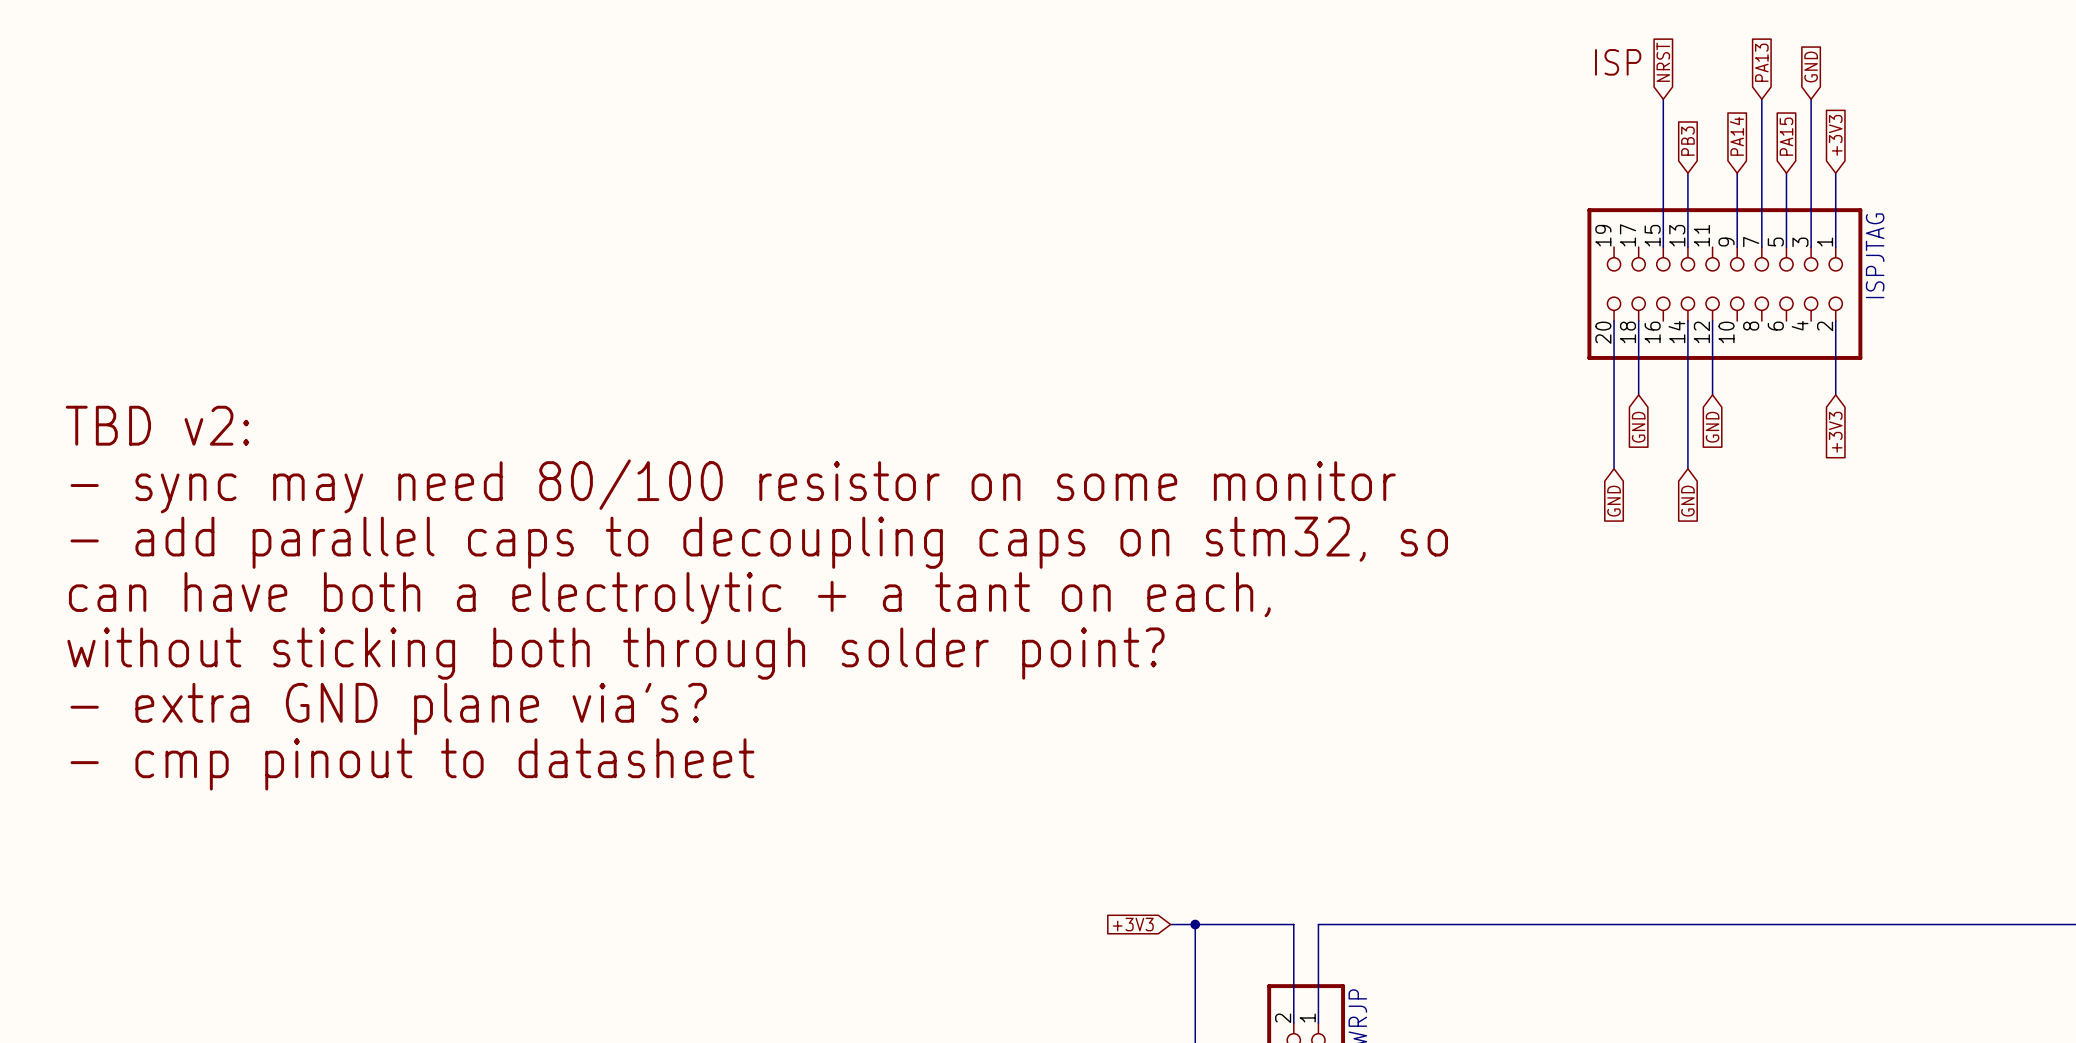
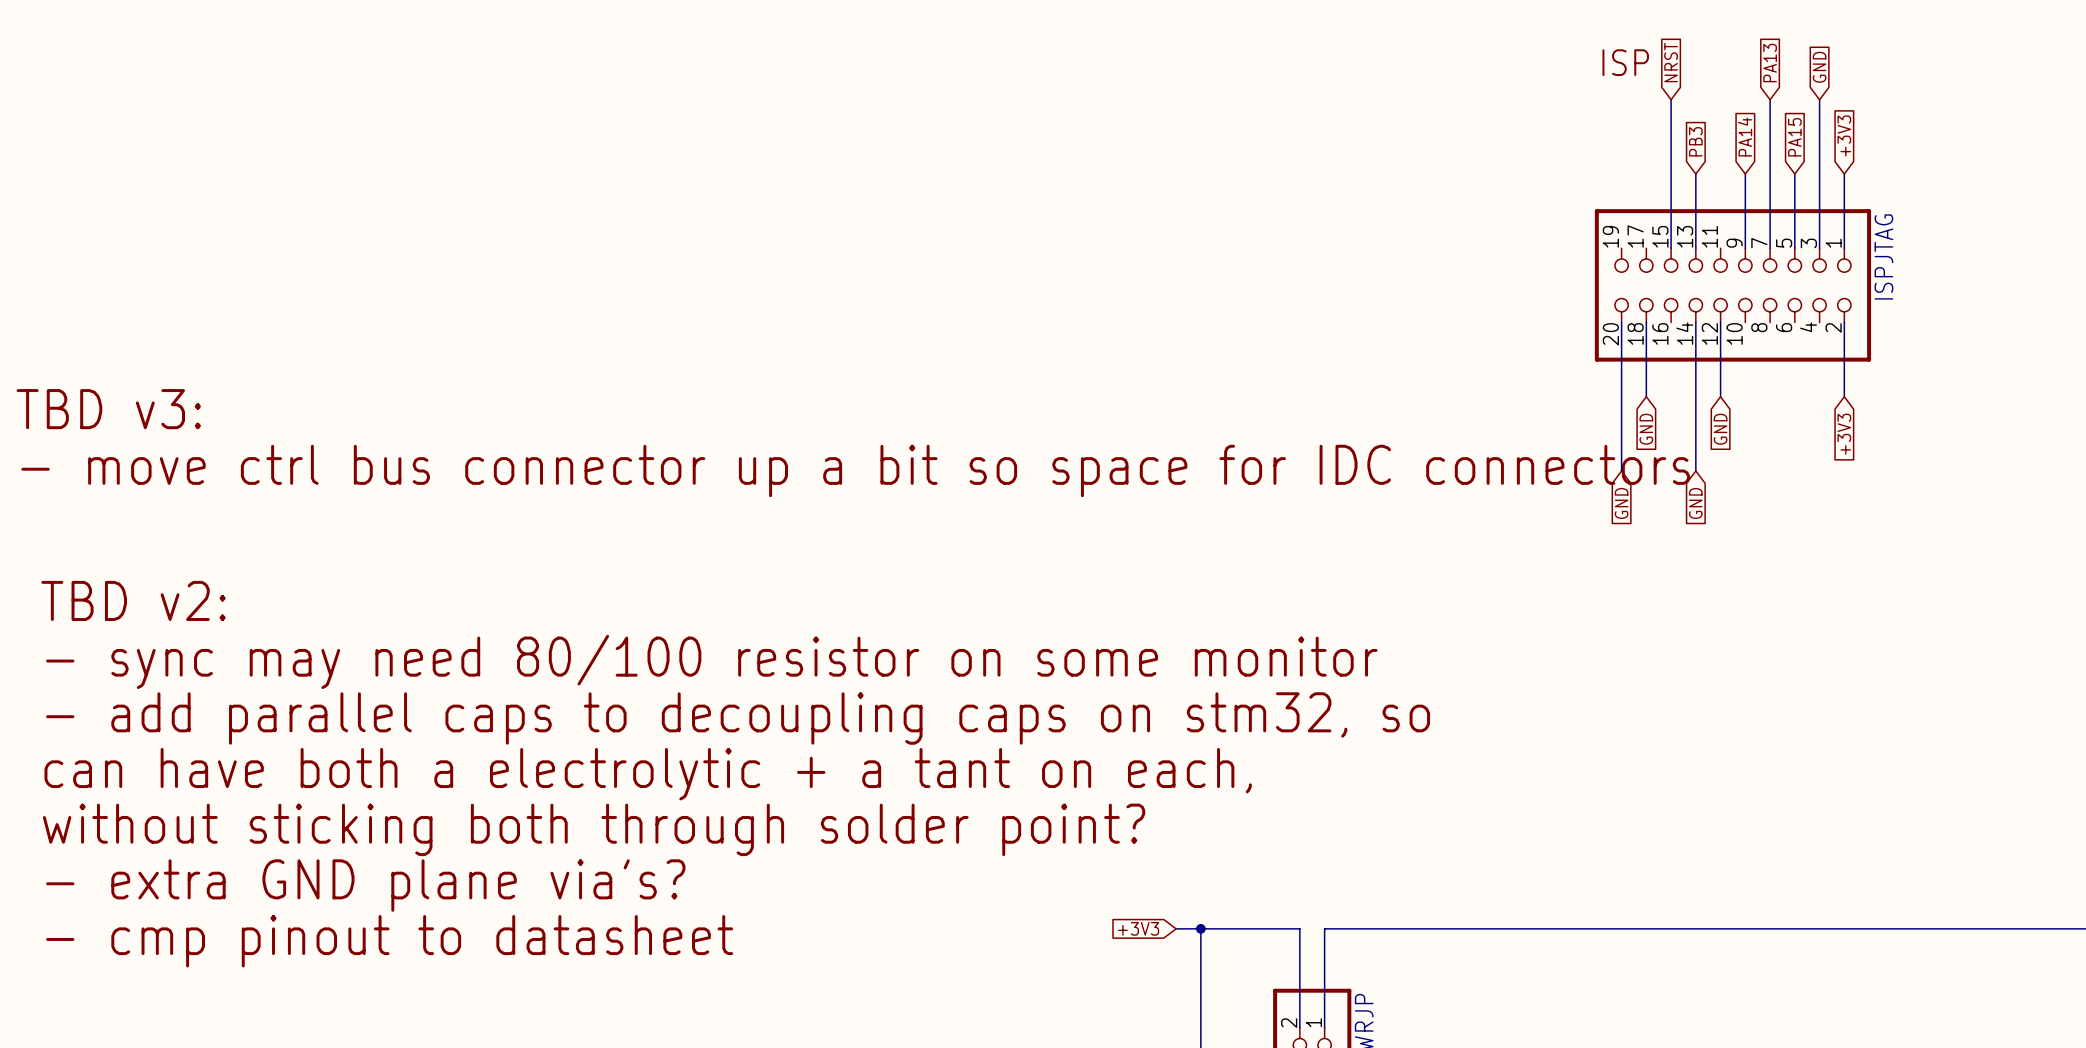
text: none -> TBD v3: (108, 409)
text position: TBD v2: (157, 425) -> TBD v2: (133, 600)
text: none -> - move ctrl bus connector up a bit so space for IDC connectors (855, 471)
text position: - sync may need 80/100 resistor on some monitor (733, 486) -> - sync may need 80/100 resistor on some monitor (711, 661)
text position: - add parallel caps to decoupling caps on stm32, so (759, 542) -> - add parallel caps to decoupling caps on stm32, so (738, 718)
text position: can have both a electrolytic + a tant on each, (669, 598) -> can have both a electrolytic + a tant on each, (648, 774)
text position: without sticking both through solder point? (615, 653) -> without sticking both through solder point? (594, 829)
text position: - extra GND plane via's? (388, 708) -> - extra GND plane via's? (365, 885)
text position: - cmp pinout to datasheet (412, 764) -> - cmp pinout to datasheet (389, 941)

